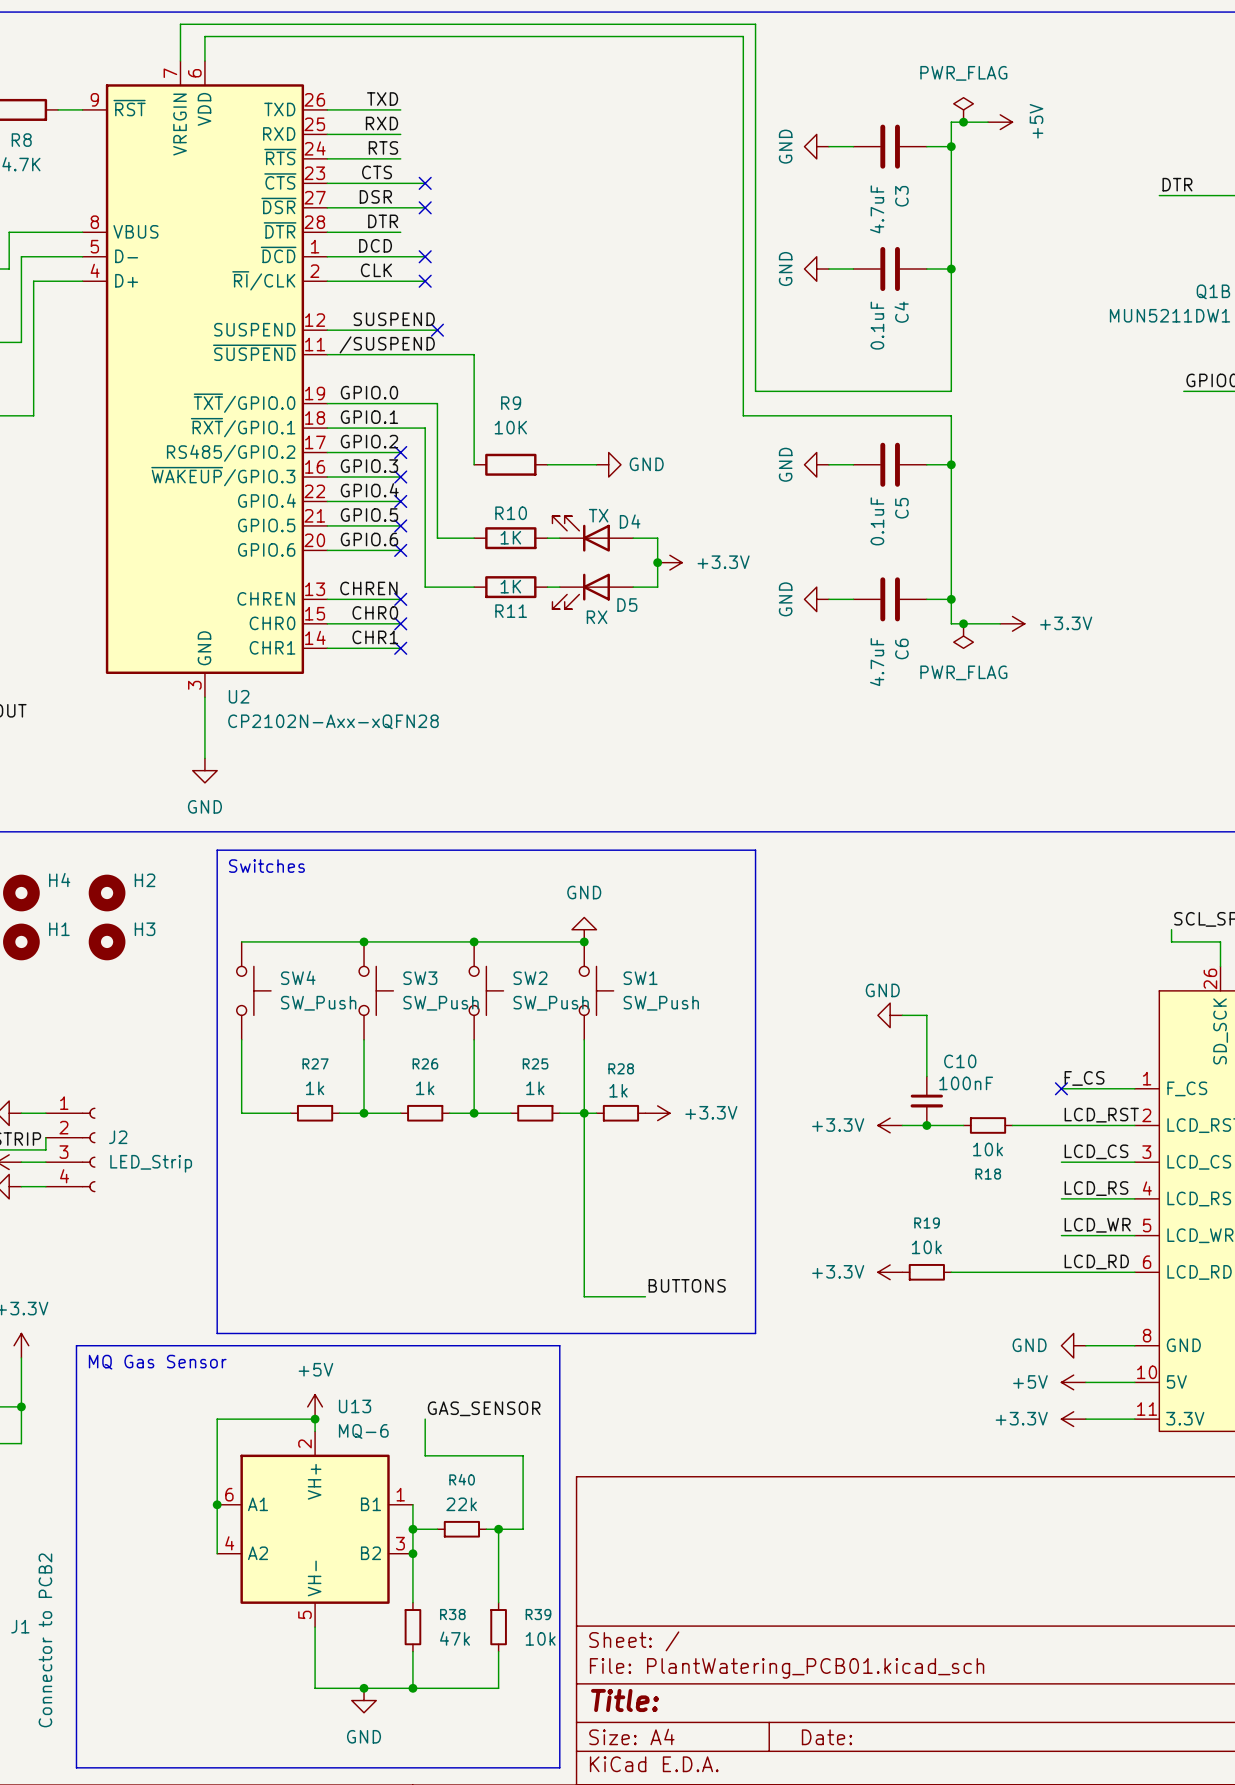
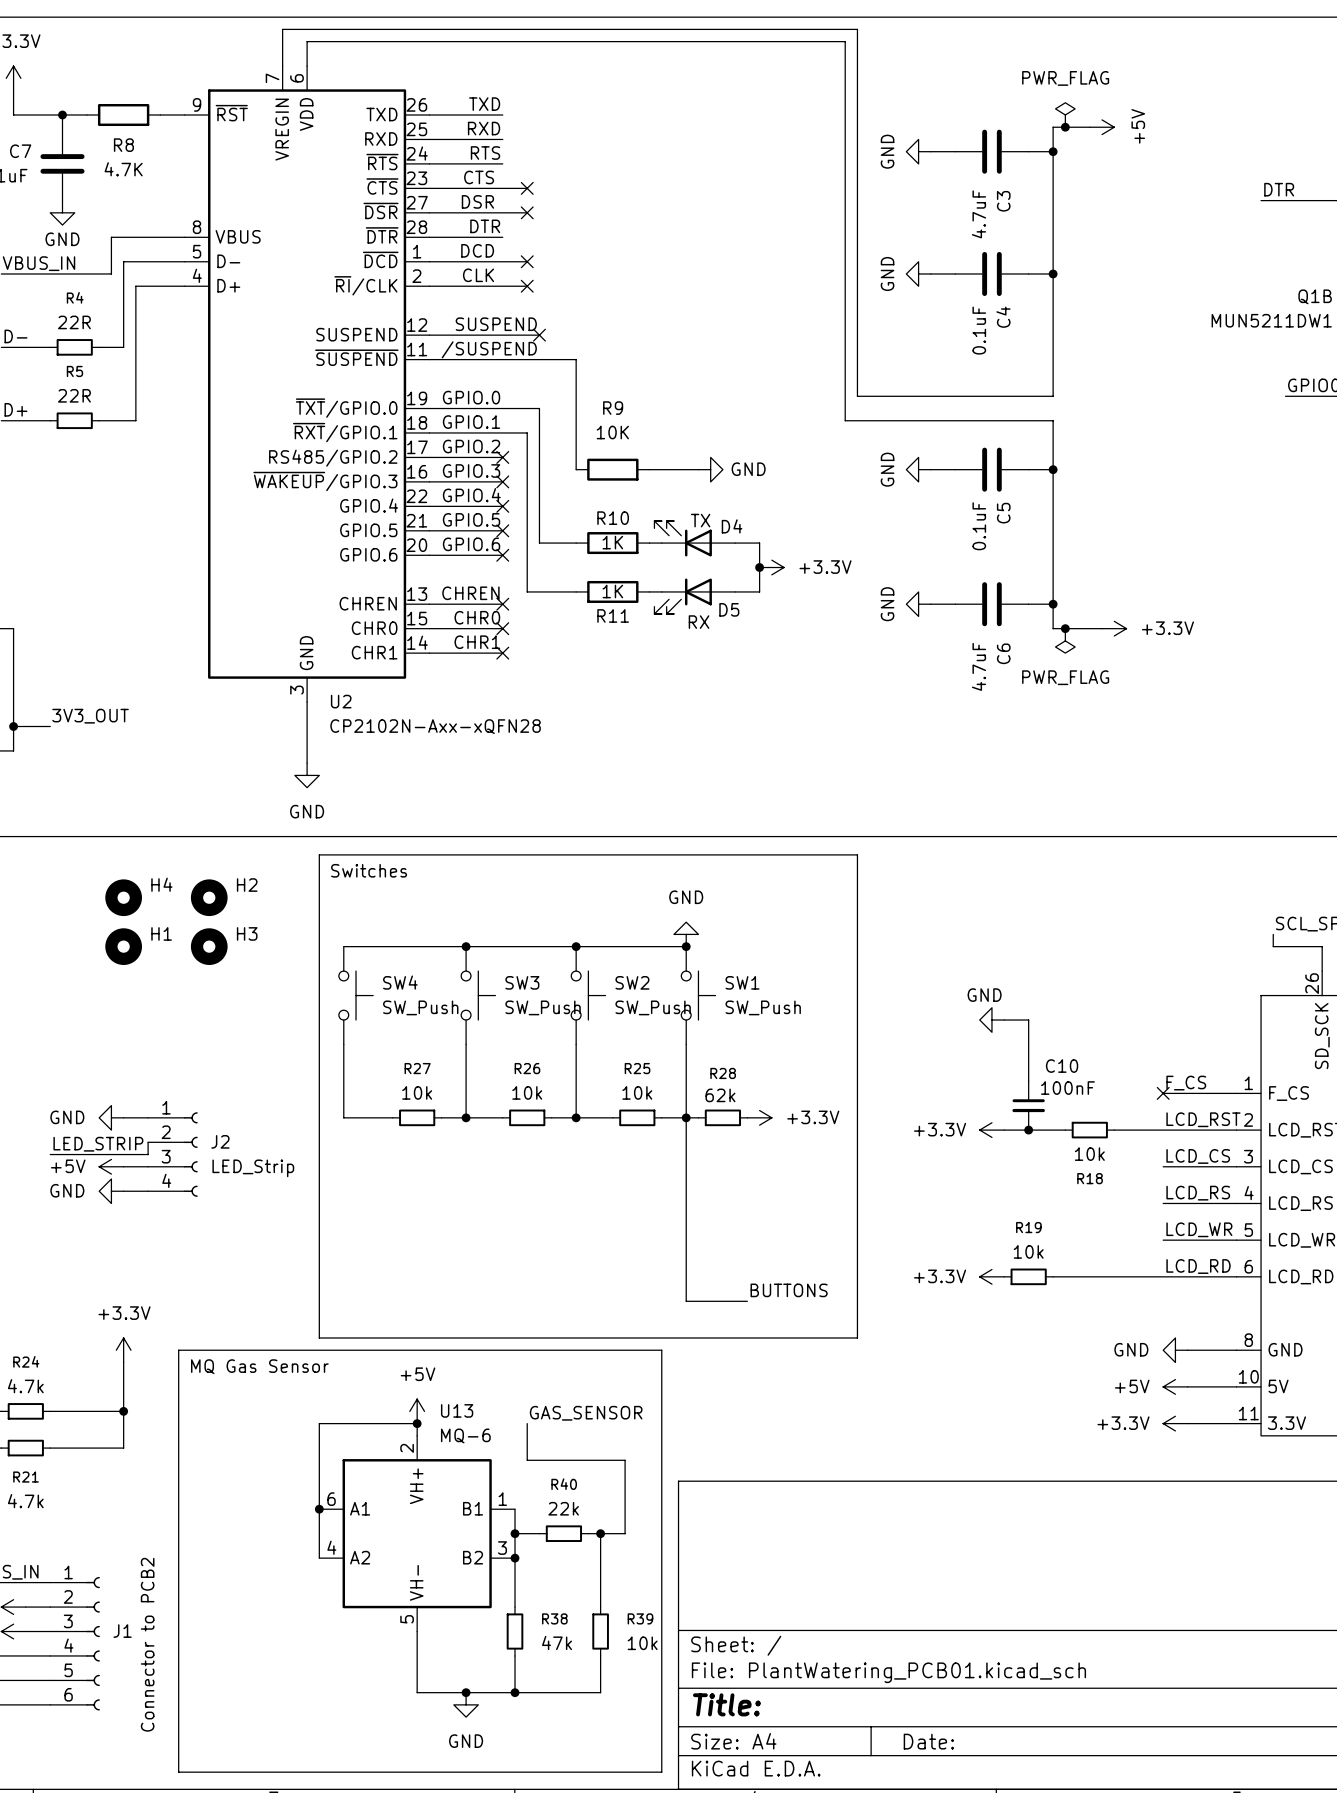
R27 value: 1k (315, 1088) -> 10k (417, 1092)
R26 value: 1k (425, 1088) -> 10k (527, 1092)
R25 value: 1k (535, 1088) -> 10k (637, 1092)
R28 value: 1k (618, 1090) -> 62k (720, 1095)

